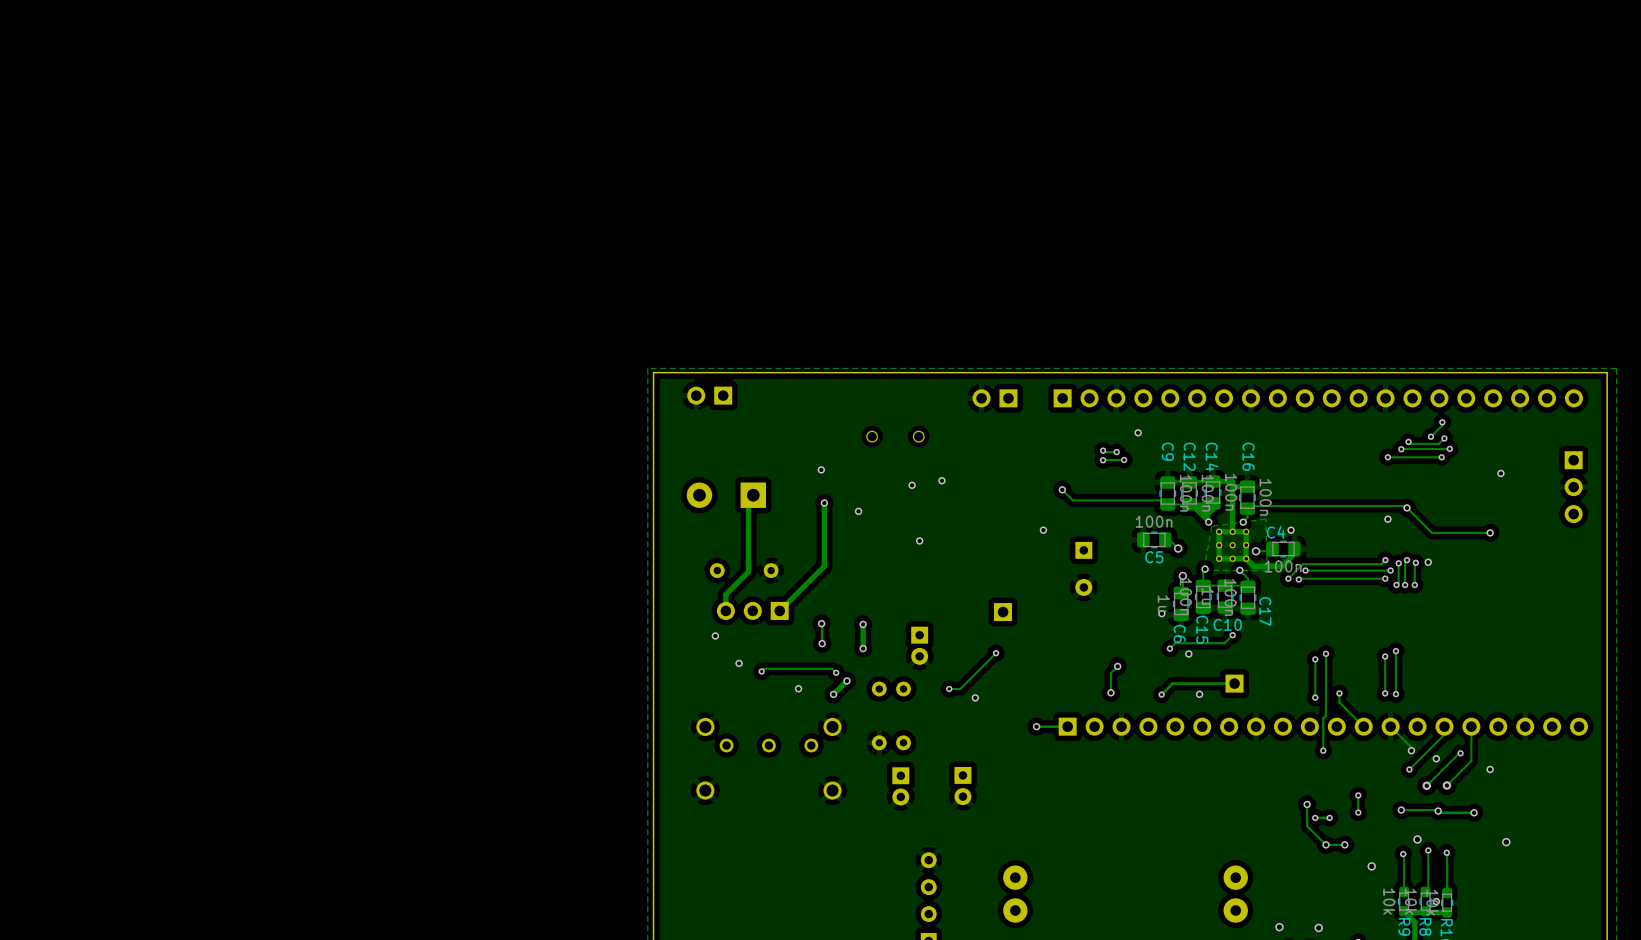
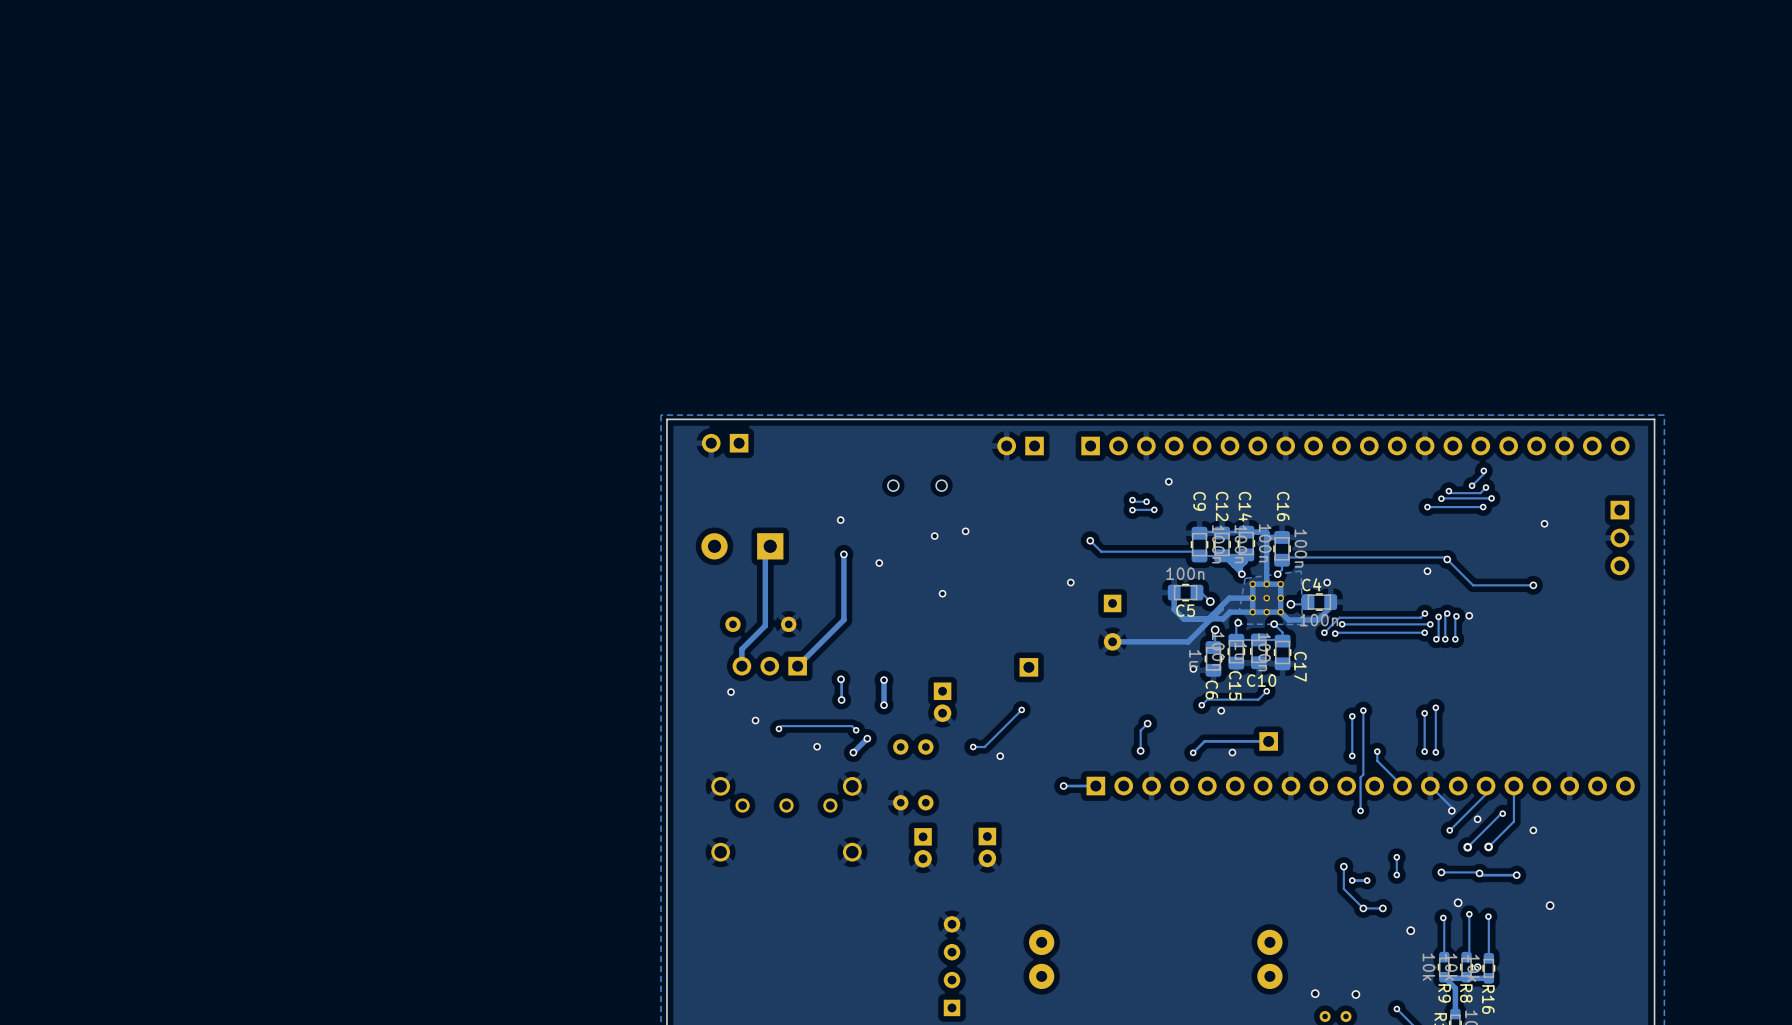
track: none -> (1174, 592) (1174, 609) (1183, 618) (1223, 618) (1229, 612) (1252, 612)
track: none -> (1252, 598) (1229, 598) (1208, 618)
track: none -> (1221, 606) (1221, 608) (1188, 641) (1112, 641)

